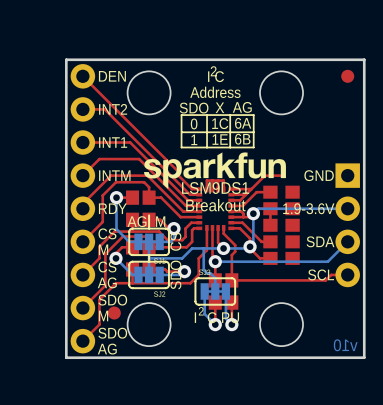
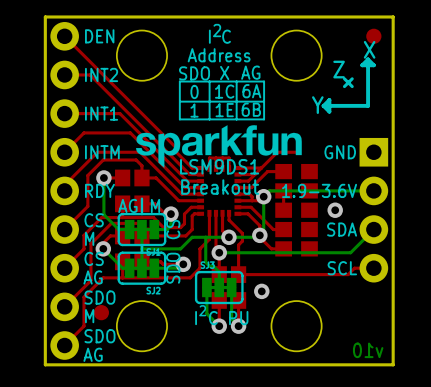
text: none -> X (369, 49)
line: none -> (368, 59) (368, 105) (323, 105)
line: none -> (368, 59) (362, 65) (373, 65) (368, 59)
text: none -> Z (339, 69)
line: none -> (344, 78) (352, 86)
line: none -> (352, 78) (344, 86)
text: none -> Y (317, 105)
line: none -> (323, 105) (329, 100) (329, 111) (323, 105)
via: none -> (335, 210)
via: none -> (261, 291)

